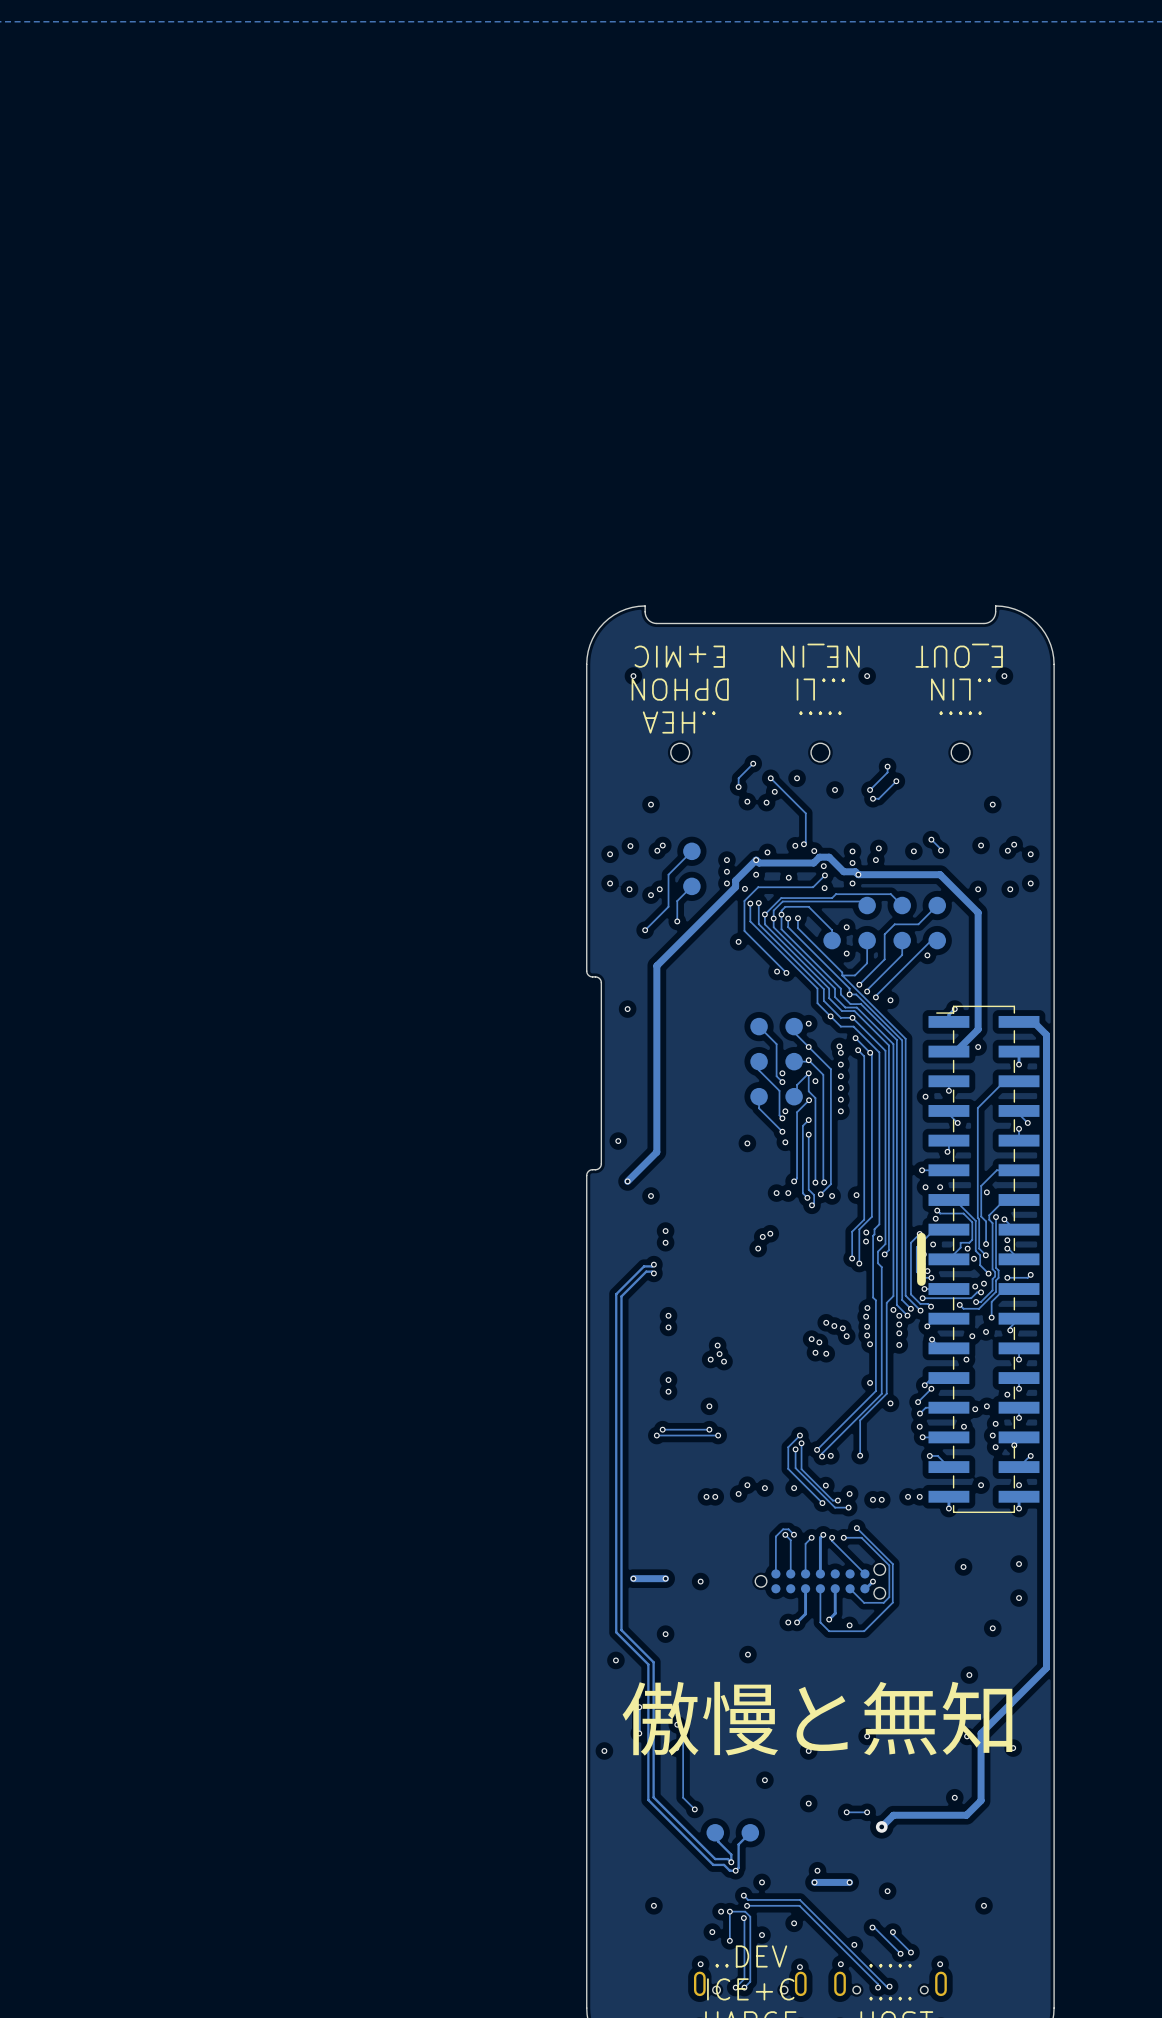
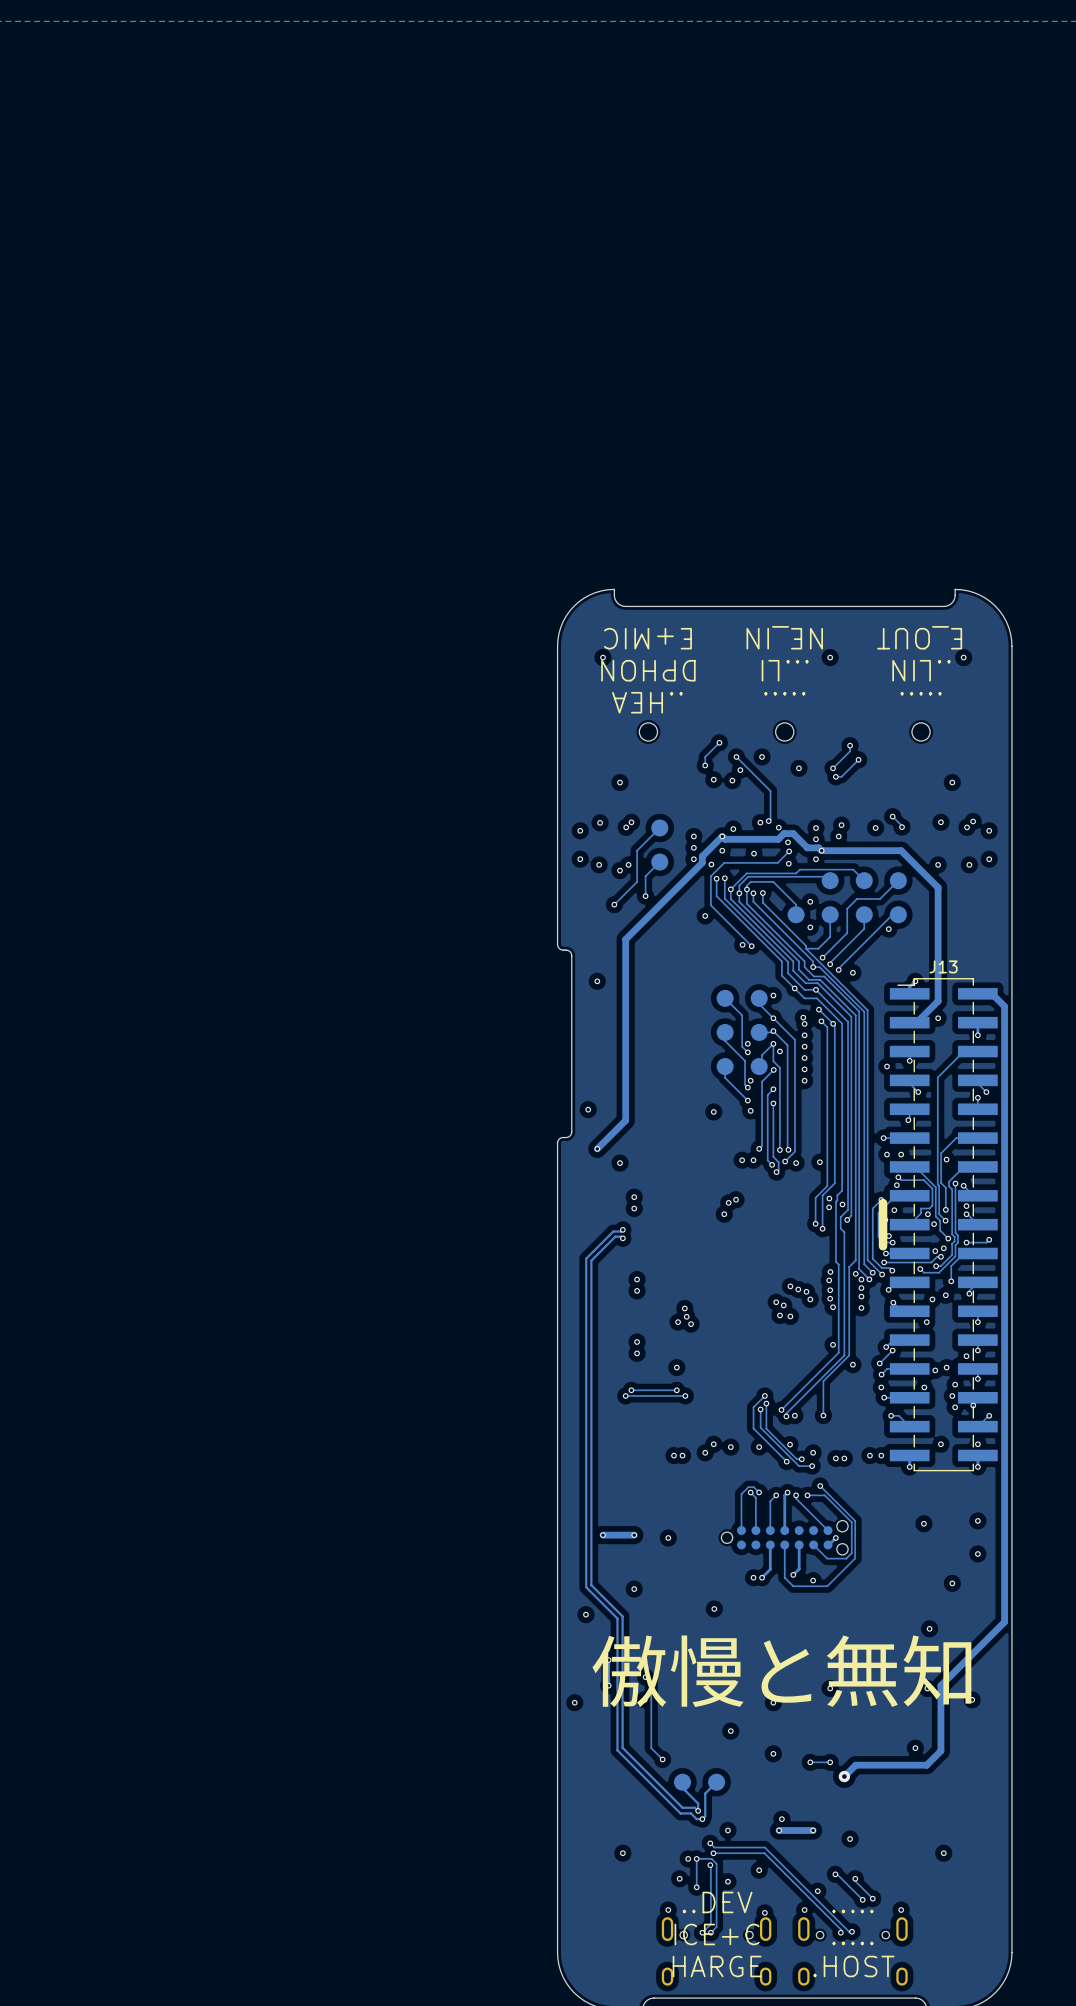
J13 name: none -> J13 (943, 966)

